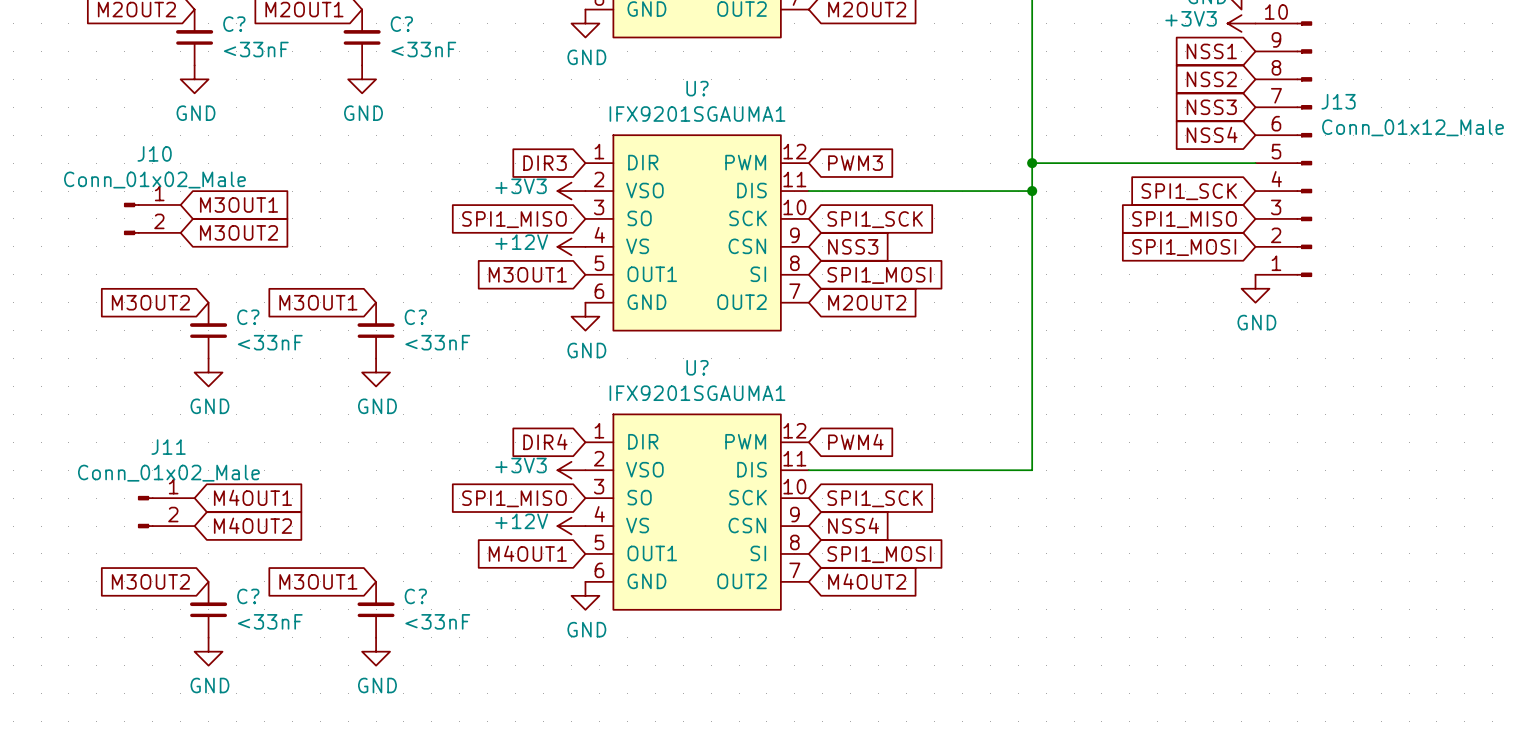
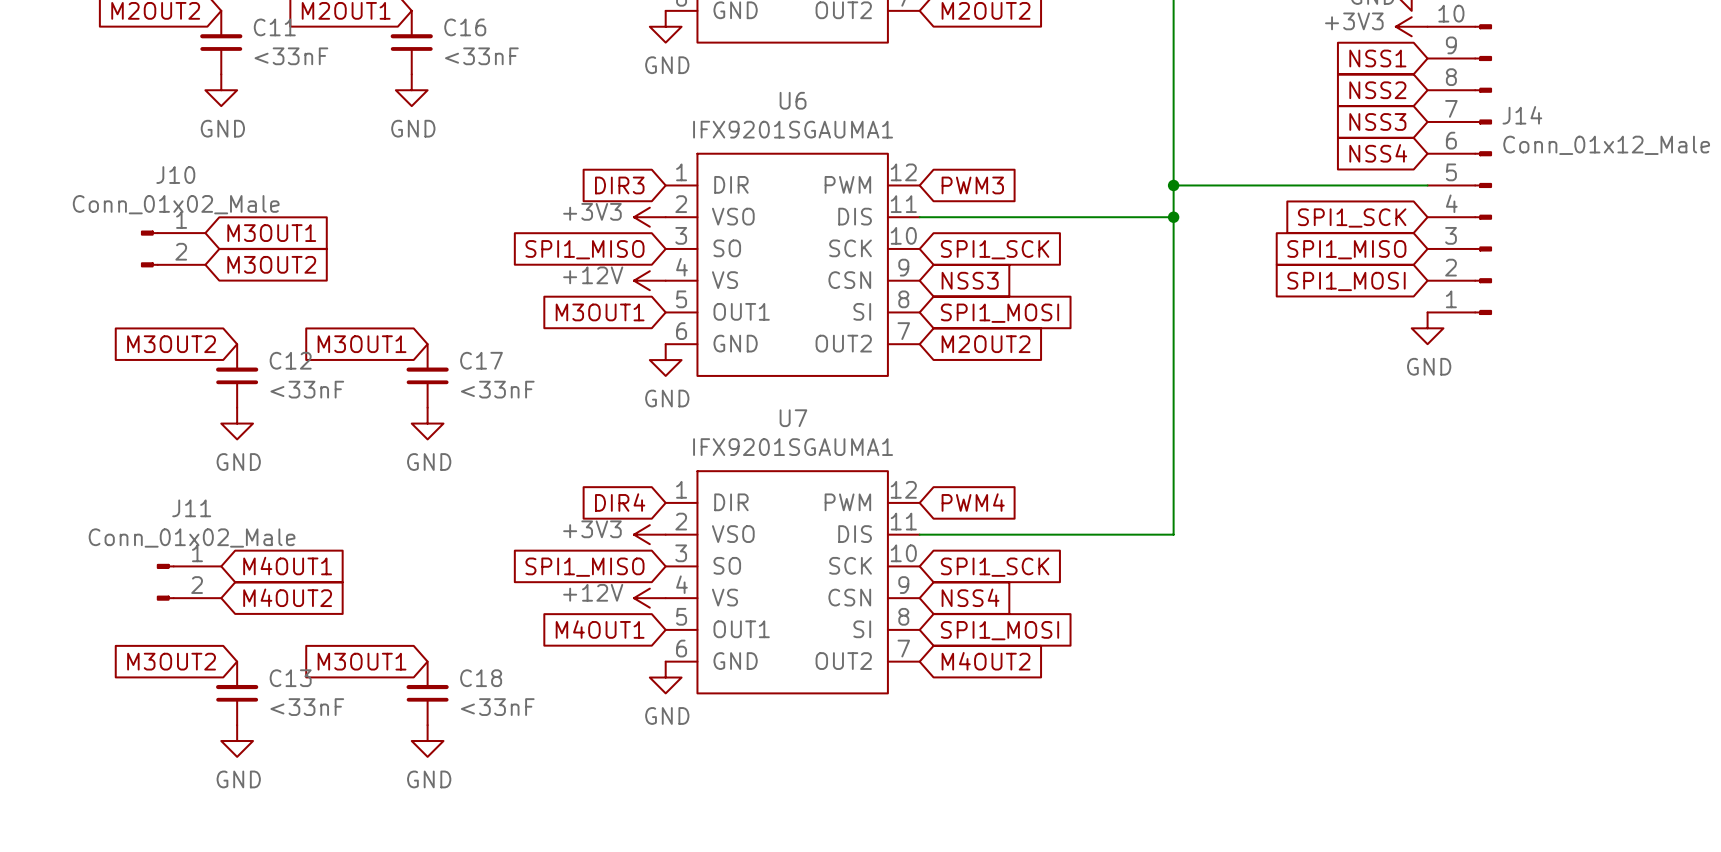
C? name: C? (234, 24) -> C11 (274, 27)
C? name: C? (401, 24) -> C16 (465, 27)
U? name: U? (697, 88) -> U6 (793, 100)
J13 name: J13 (1338, 101) -> J14 (1522, 115)
C? name: C? (248, 317) -> C12 (290, 360)
C? name: C? (415, 317) -> C17 (481, 360)
U? name: U? (697, 367) -> U7 (793, 418)
C? name: C? (248, 596) -> C13 (290, 678)
C? name: C? (415, 596) -> C18 (481, 678)

